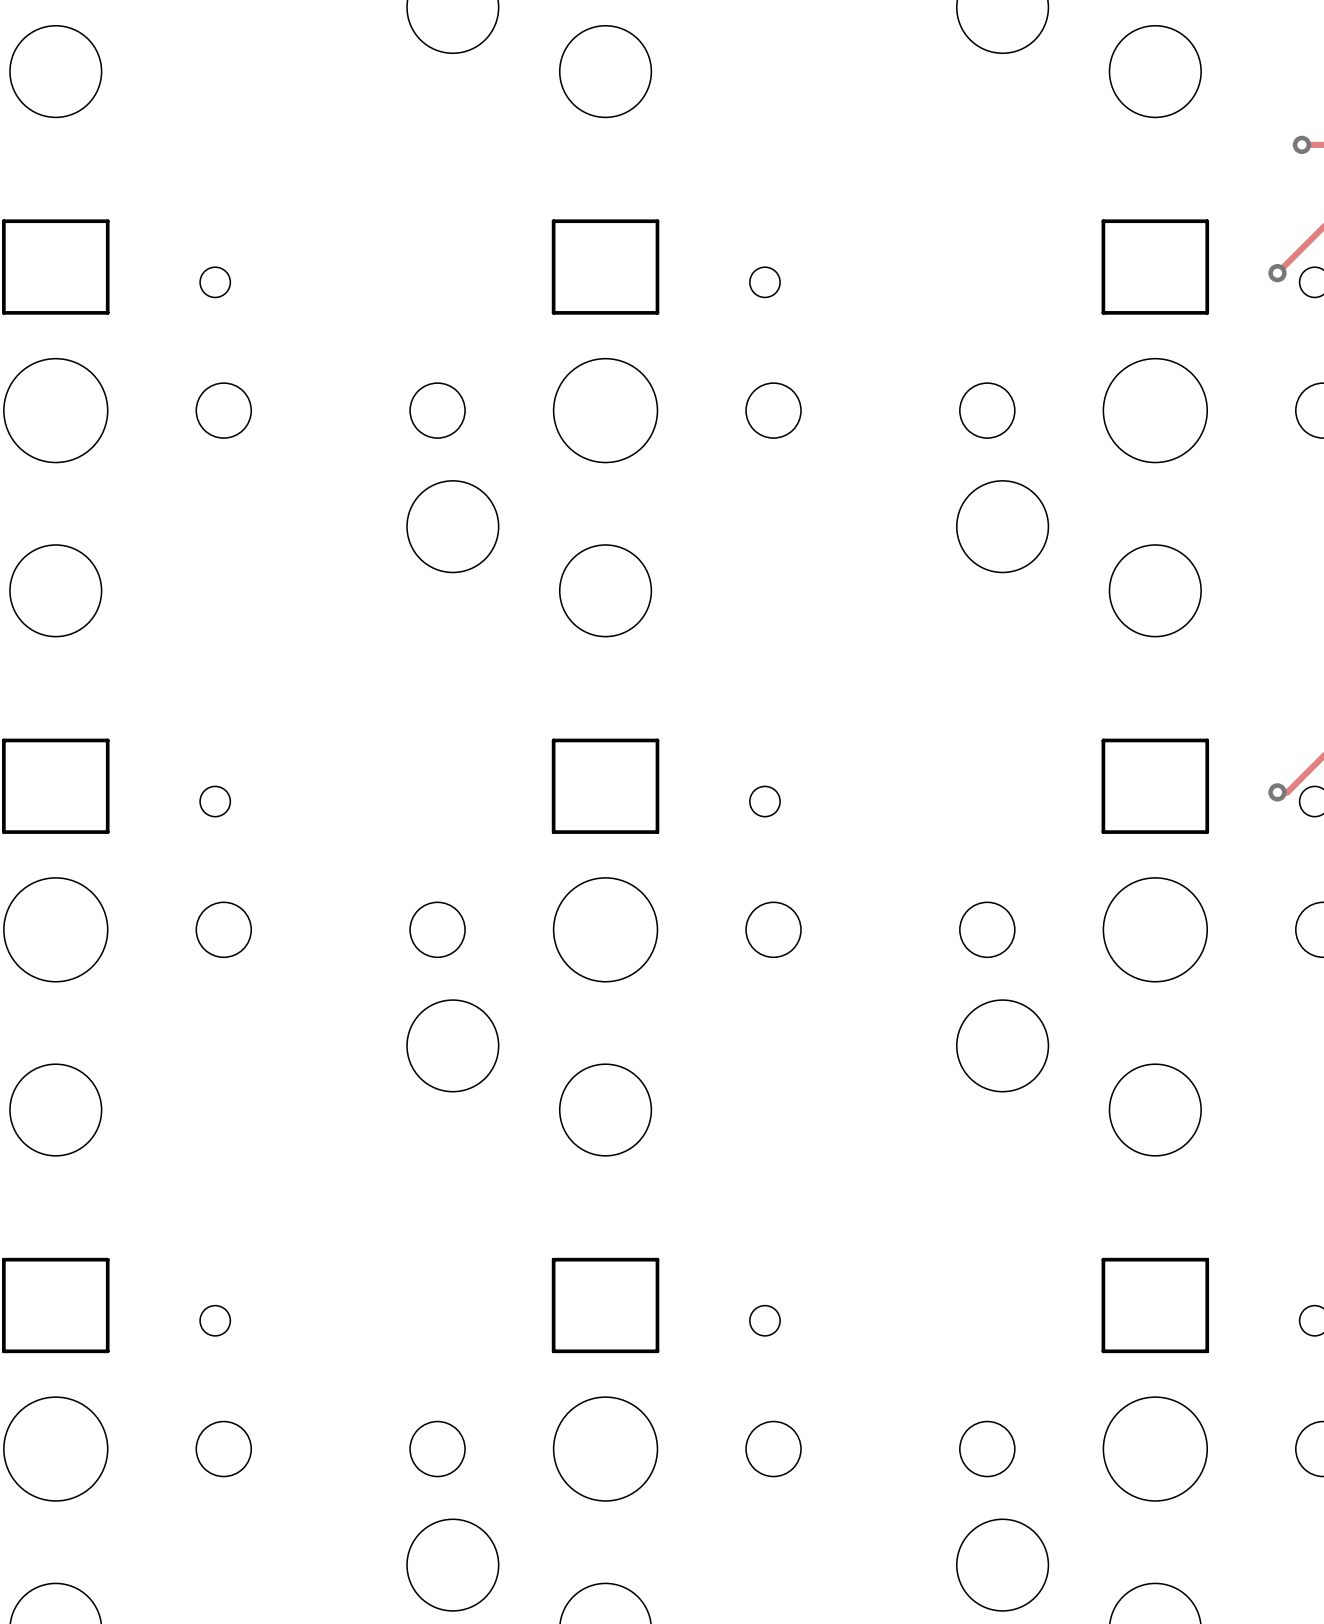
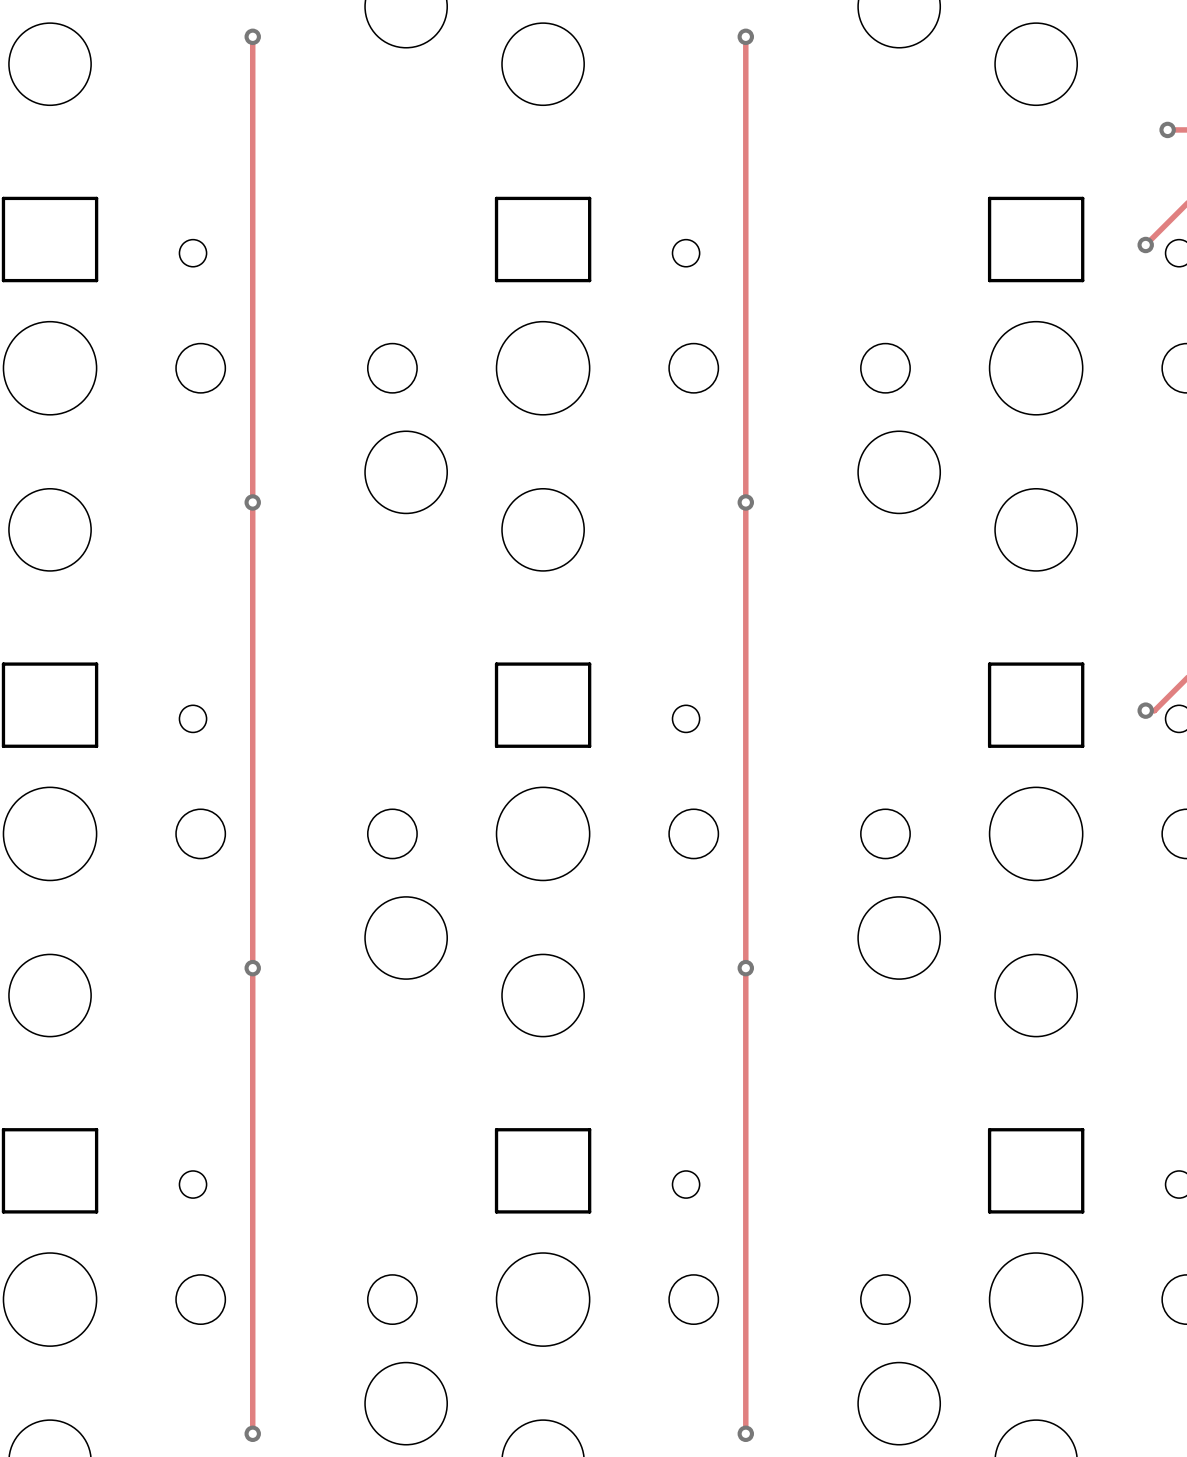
track: none -> (252, 36) (252, 1433)
via: none -> (252, 36)
track: none -> (745, 36) (745, 1433)
via: none -> (745, 36)
via: none -> (252, 502)
via: none -> (745, 502)
via: none -> (252, 968)
via: none -> (745, 968)
via: none -> (252, 1433)
via: none -> (745, 1433)

